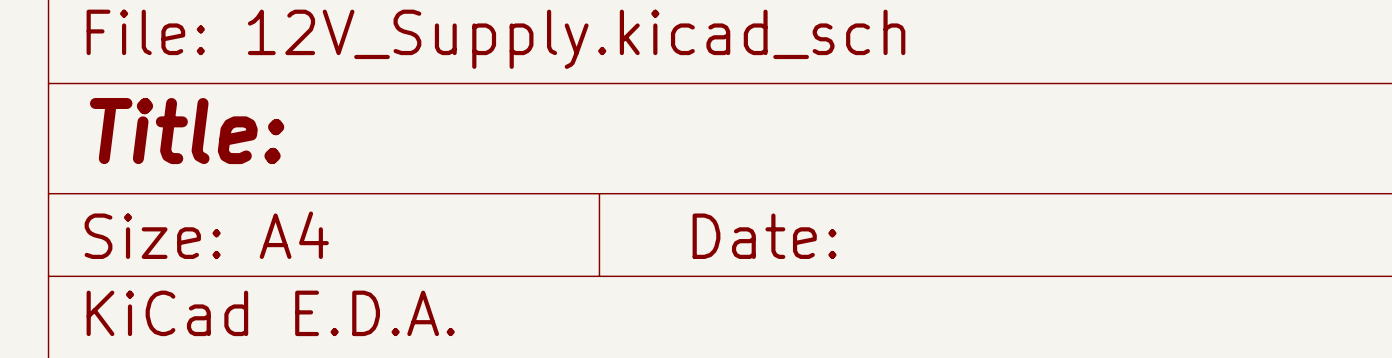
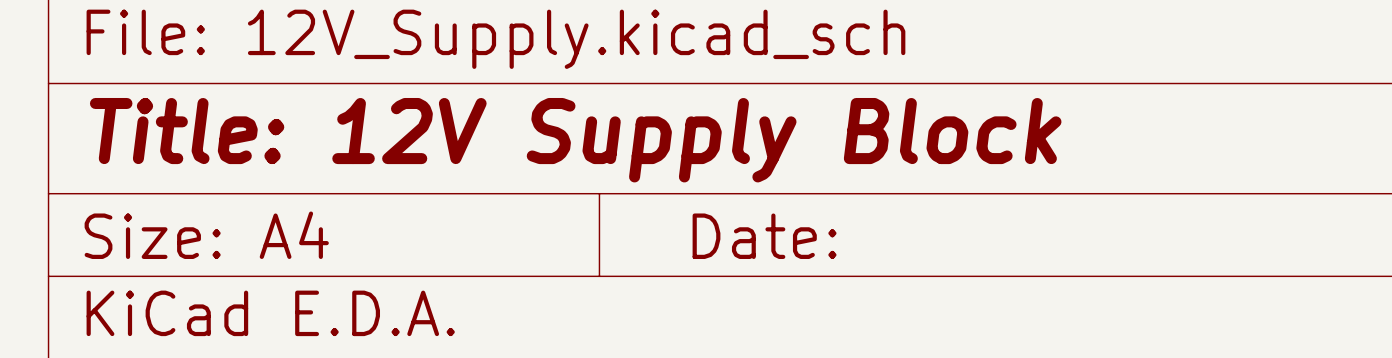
title block: Title: (187, 131) -> Title: 12V Supply Block (575, 140)

